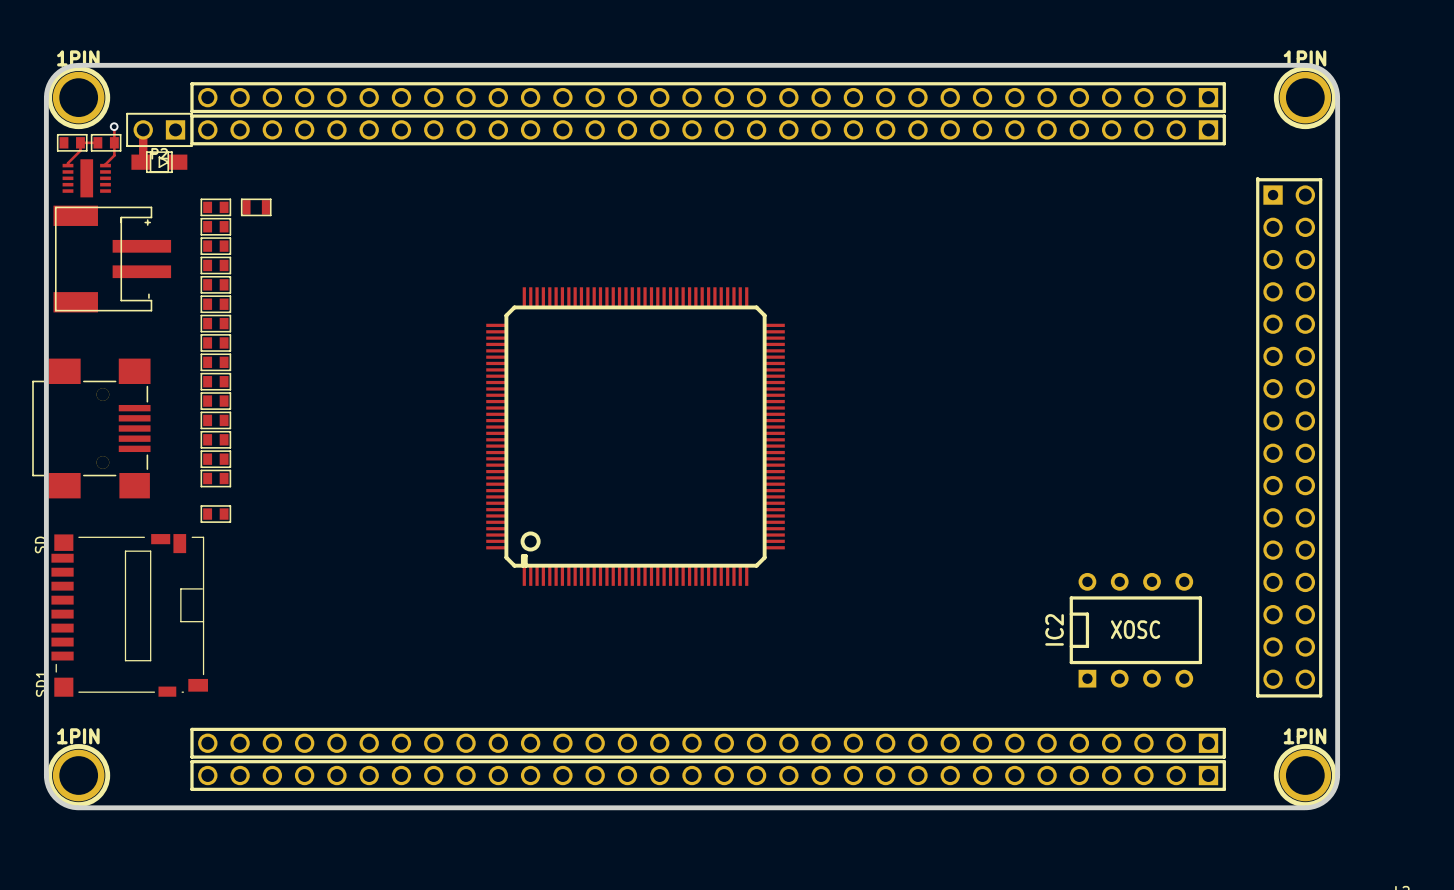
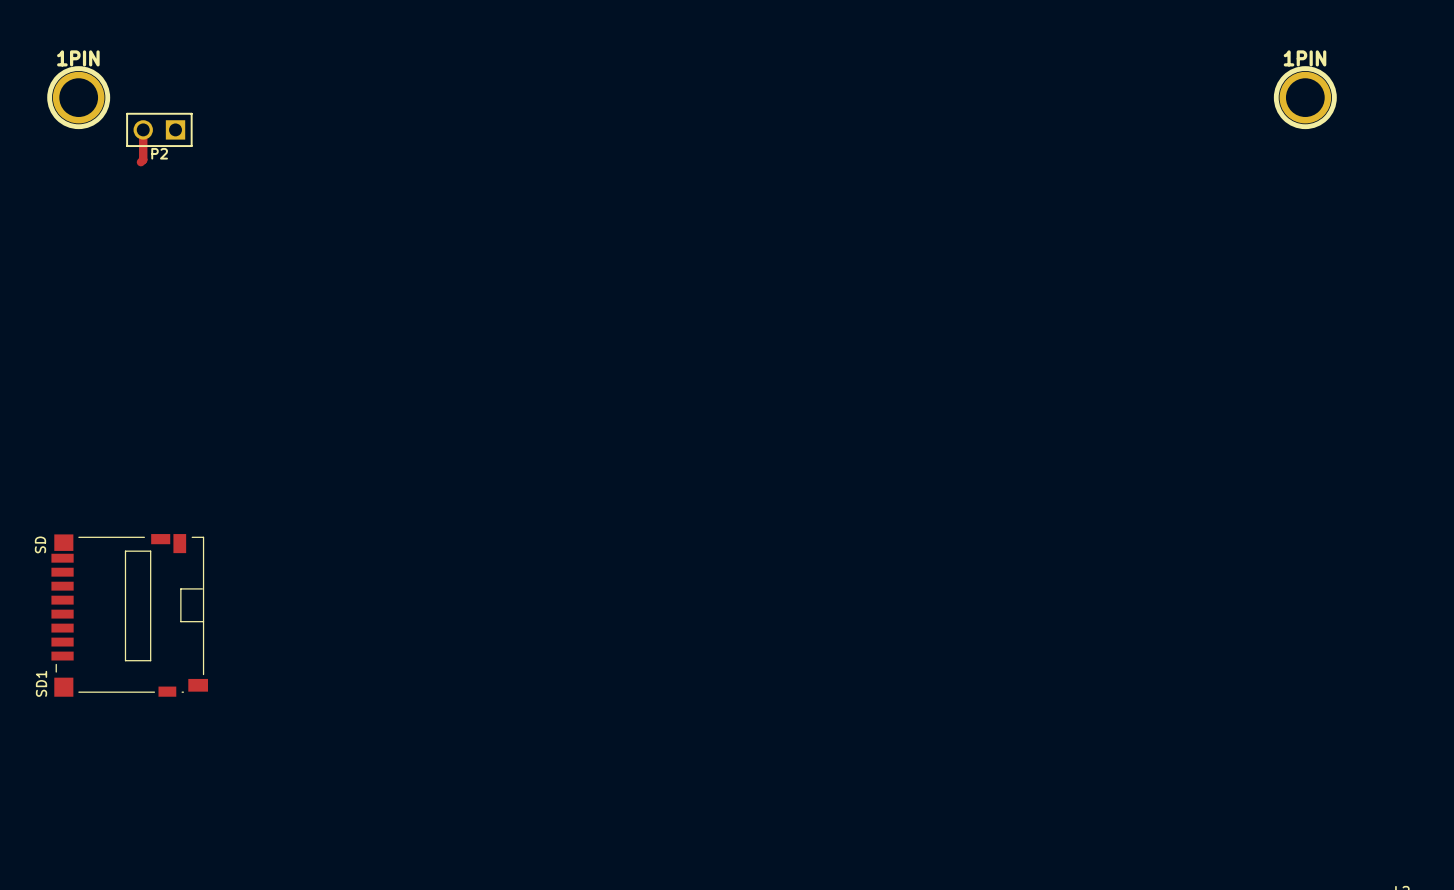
board edge: (1305, 65) (78, 65) (62, 69) (50, 81) (46, 97) (46, 775) -> none
board edge: (1305, 65) (1318, 68) (1328, 75) (1335, 85) (1337, 98) -> none
part: (708, 97) -> none
board edge: (1337, 97) (1337, 775) -> none
track: (114, 126) (114, 155) (105, 165) -> none
via: (114, 126) -> none
part: (708, 129) -> none
part: (72, 142) -> none
track: (97, 142) (80, 142) (80, 150) (67, 163) (67, 165) -> none
part: (106, 142) -> none
part: (159, 162) -> none
part: (86, 178) -> none
part: (215, 207) -> none
part: (256, 207) -> none
part: (215, 226) -> none
part: (215, 246) -> none
part: (112, 259) -> none
part: (215, 265) -> none
part: (215, 284) -> none
part: (215, 304) -> none
part: (215, 323) -> none
part: (215, 342) -> none
part: (215, 362) -> none
part: (215, 381) -> none
part: (215, 401) -> none
part: (215, 420) -> none
part: (91, 428) -> none
part: (635, 436) -> none
part: (1289, 437) -> none
part: (215, 439) -> none
part: (215, 459) -> none
part: (215, 478) -> none
part: (215, 514) -> none
IC2: XOSC (1135, 630) -> none
part: (708, 743) -> none
board edge: (46, 774) (48, 786) (54, 797) (65, 804) (77, 807) -> none
board edge: (1337, 774) (1335, 786) (1328, 797) (1318, 804) (1306, 807) -> none
1PIN: (78, 775) -> none
part: (708, 775) -> none
1PIN: (1305, 775) -> none
board edge: (78, 807) (1305, 807) -> none

